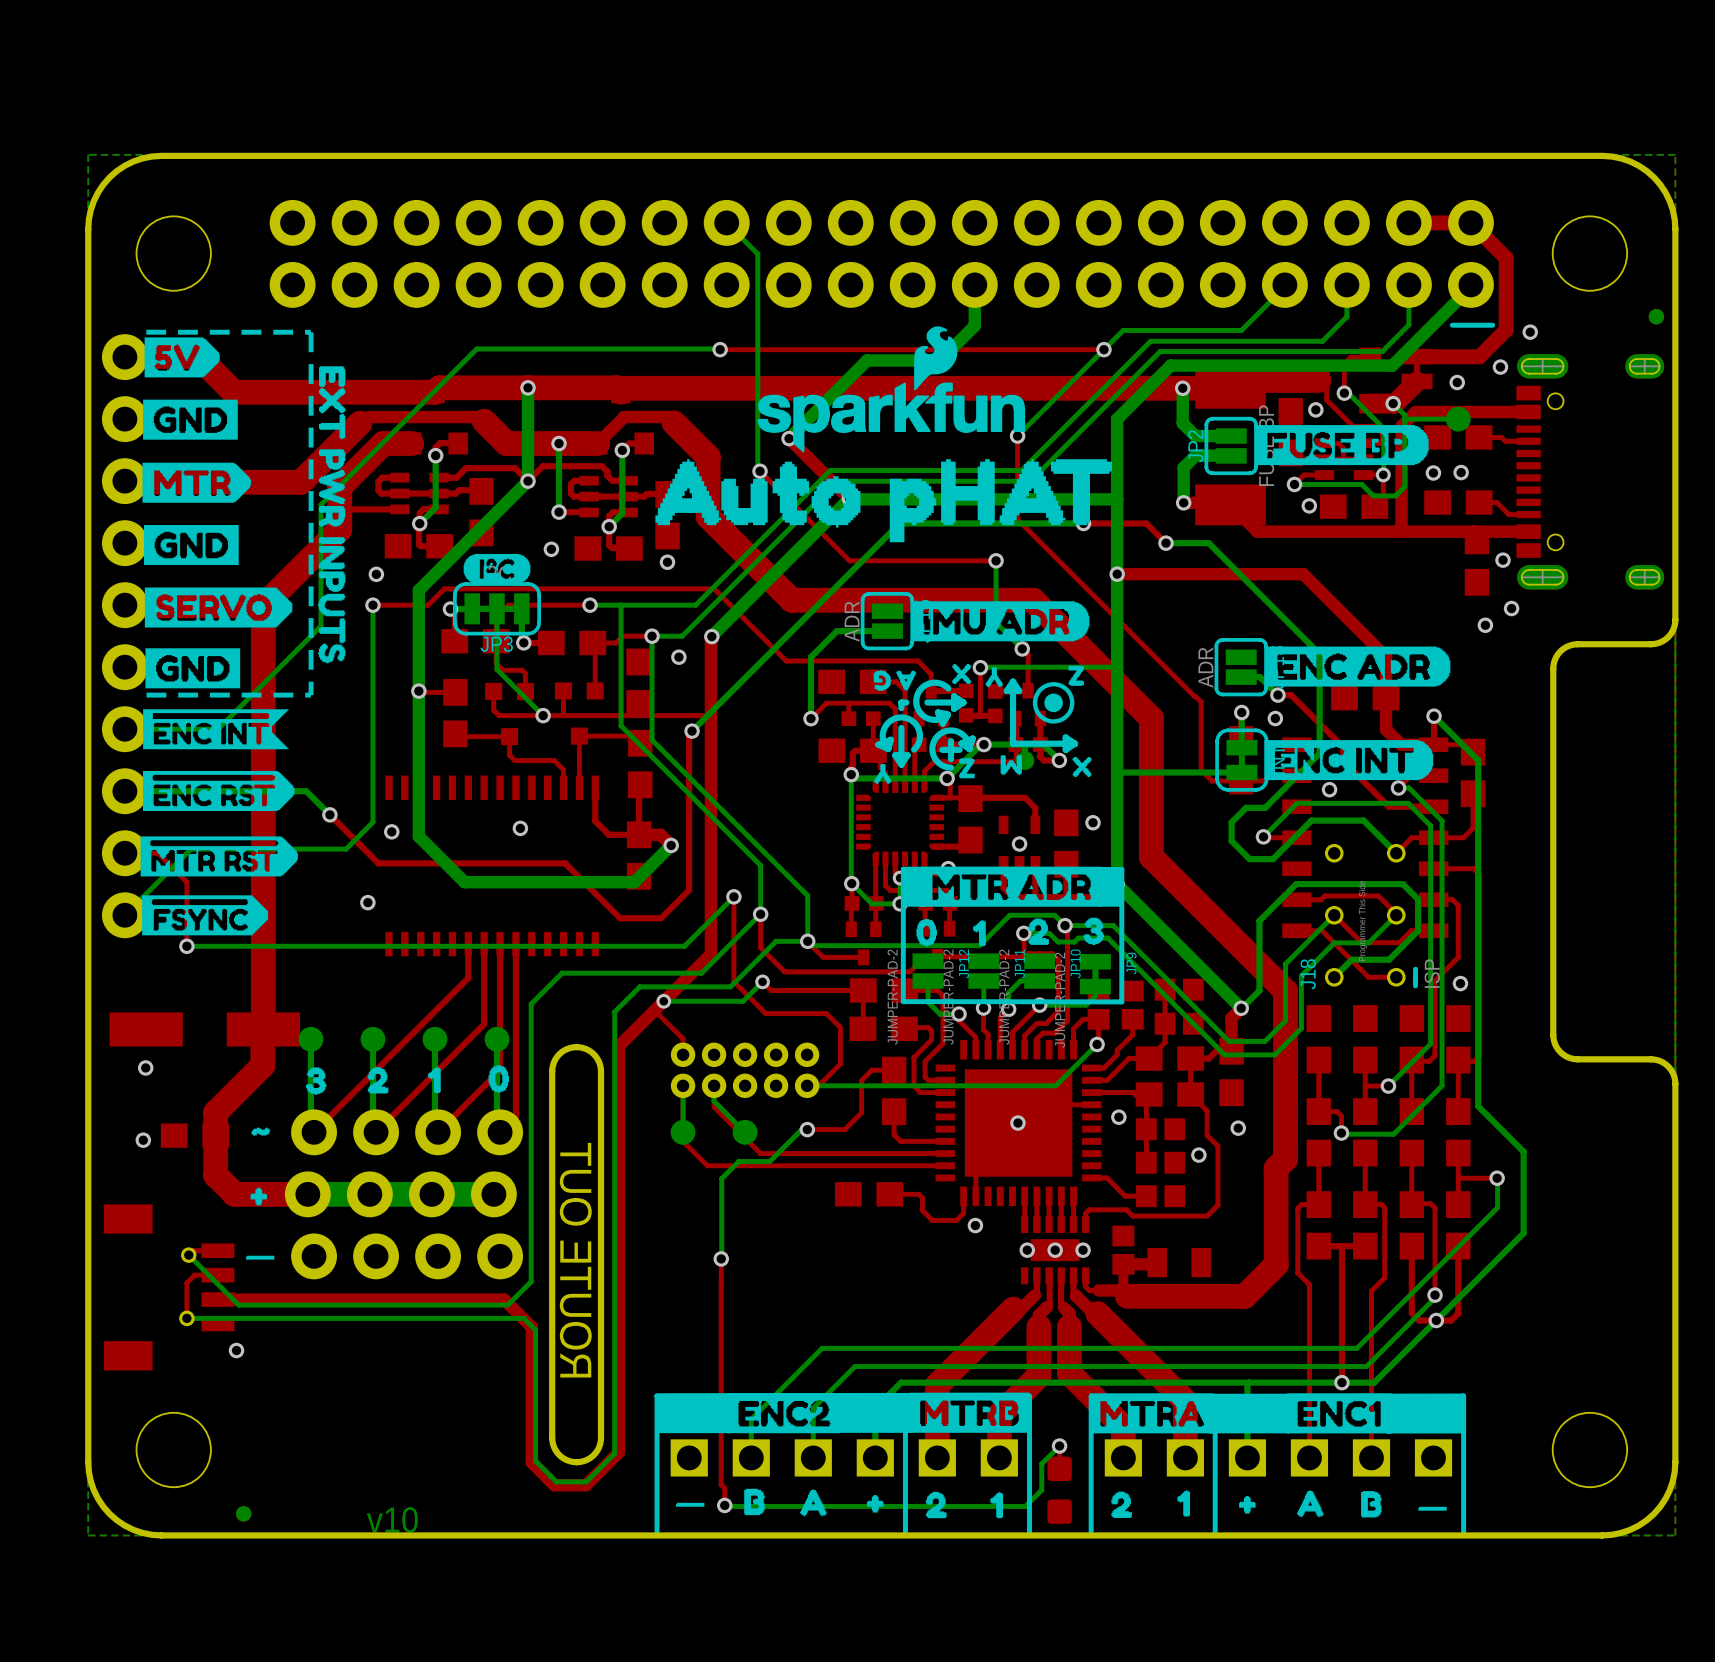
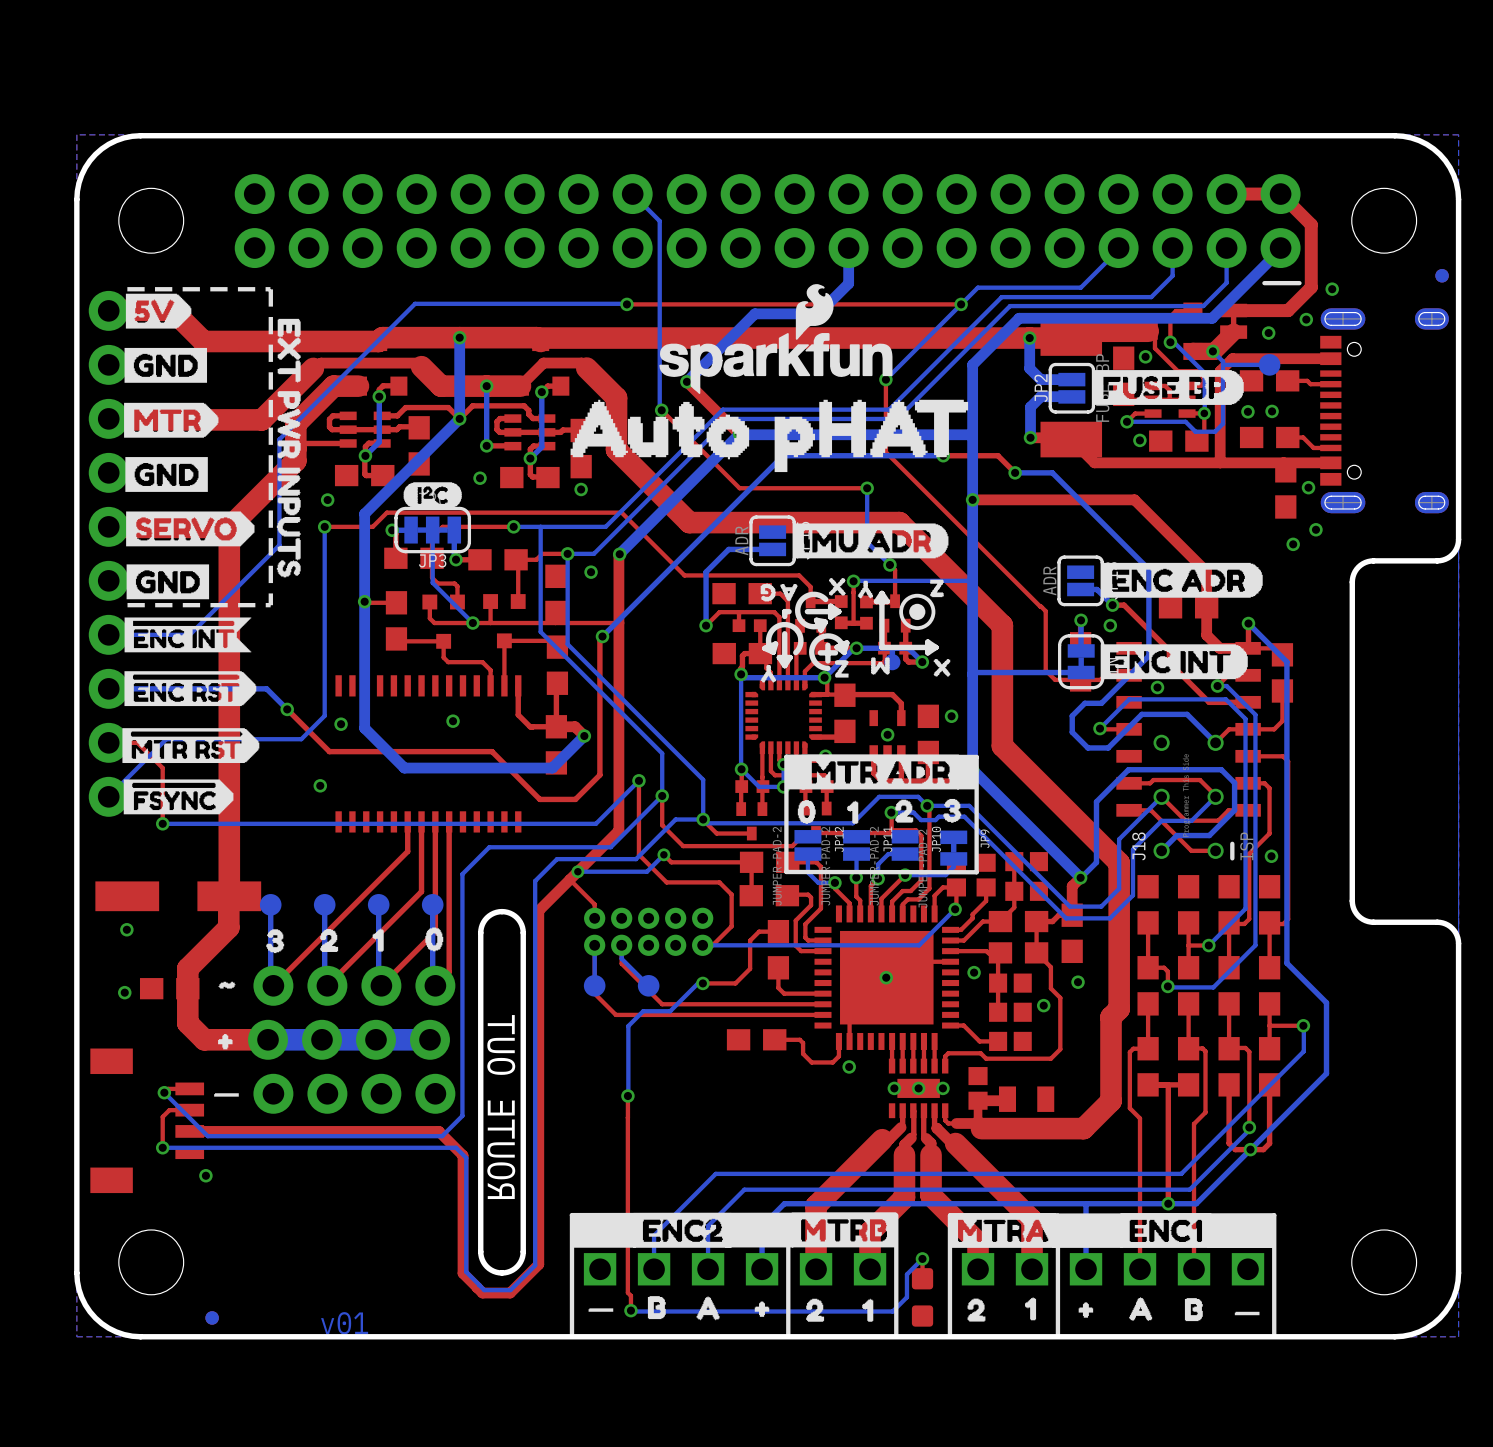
text: v10 (392, 1519) -> v01 (344, 1323)

